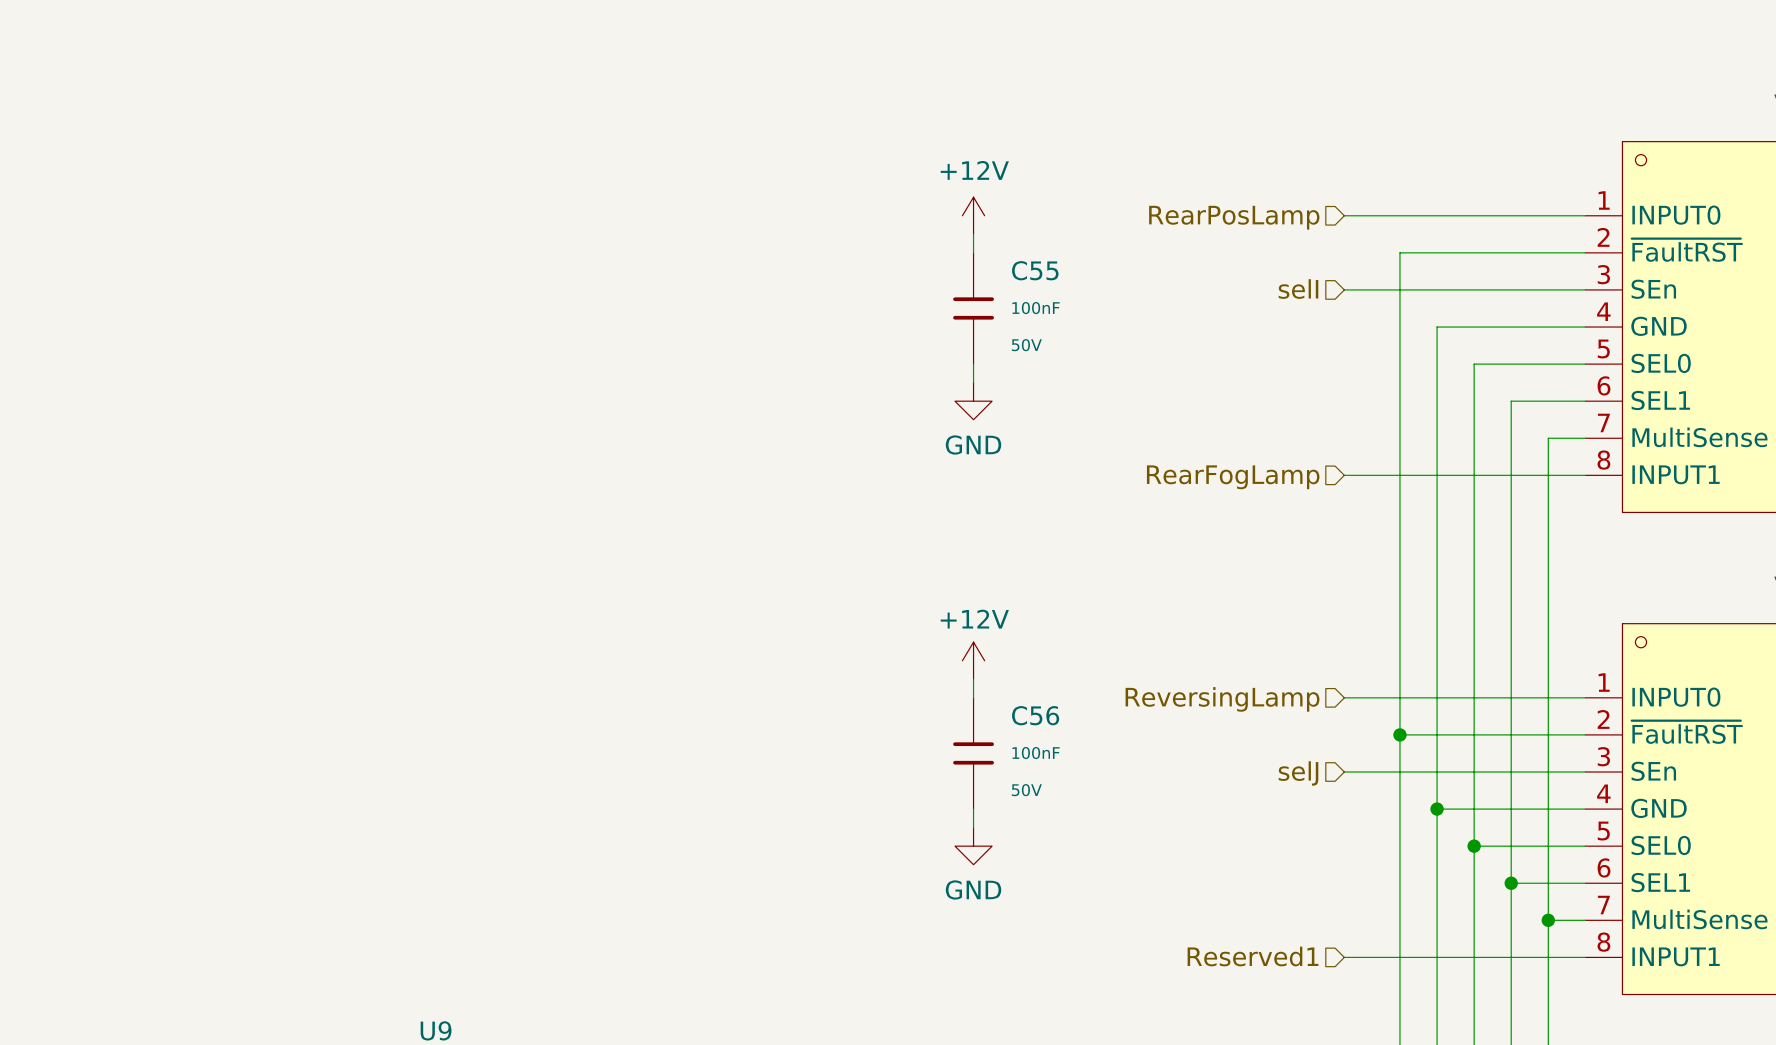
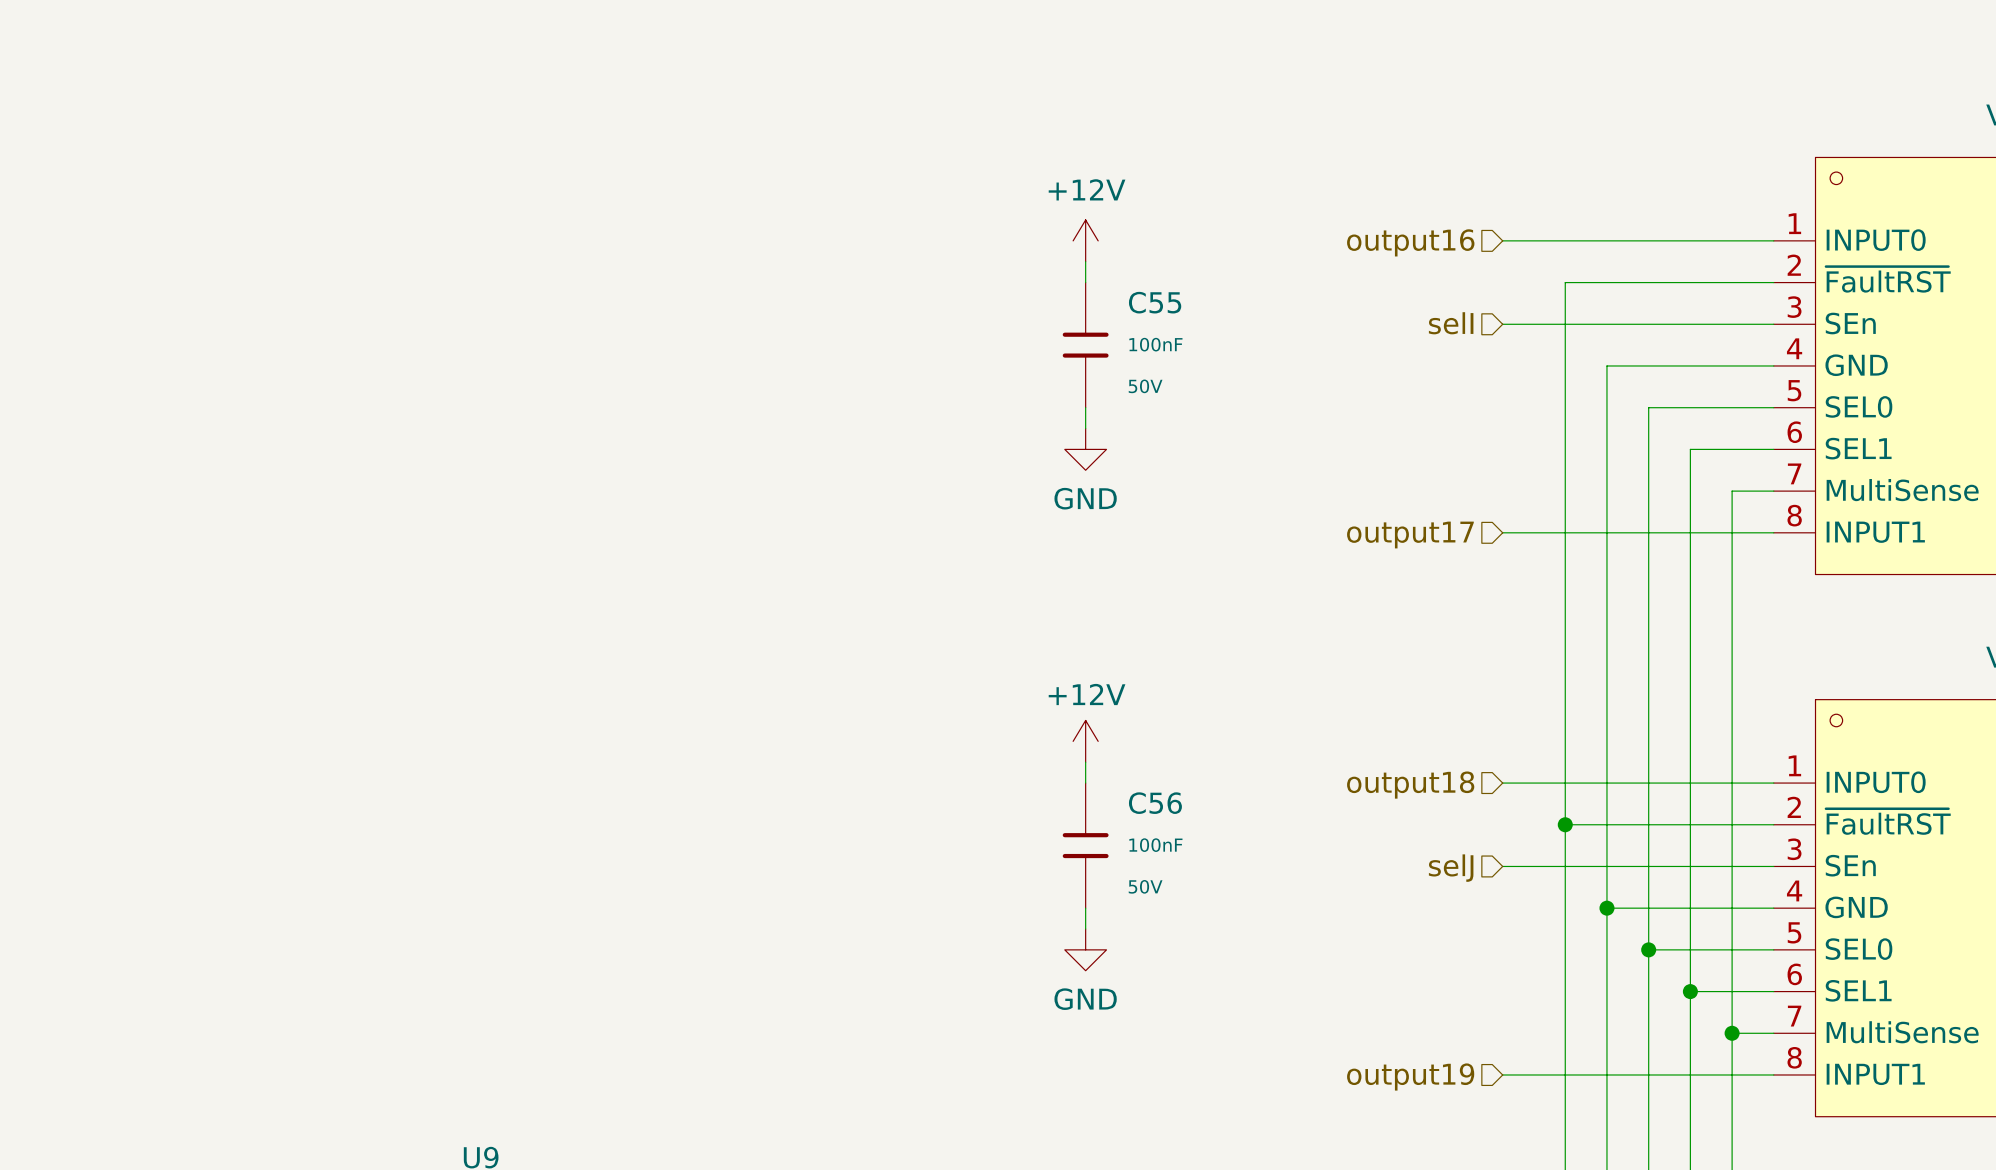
hierarchical label: RearPosLamp (1234, 217) -> output16 (1410, 242)
hierarchical label: RearFogLamp (1233, 477) -> output17 (1410, 535)
hierarchical label: ReversingLamp (1222, 699) -> output18 (1410, 785)
hierarchical label: Reserved1 (1253, 956) -> output19 (1410, 1077)

